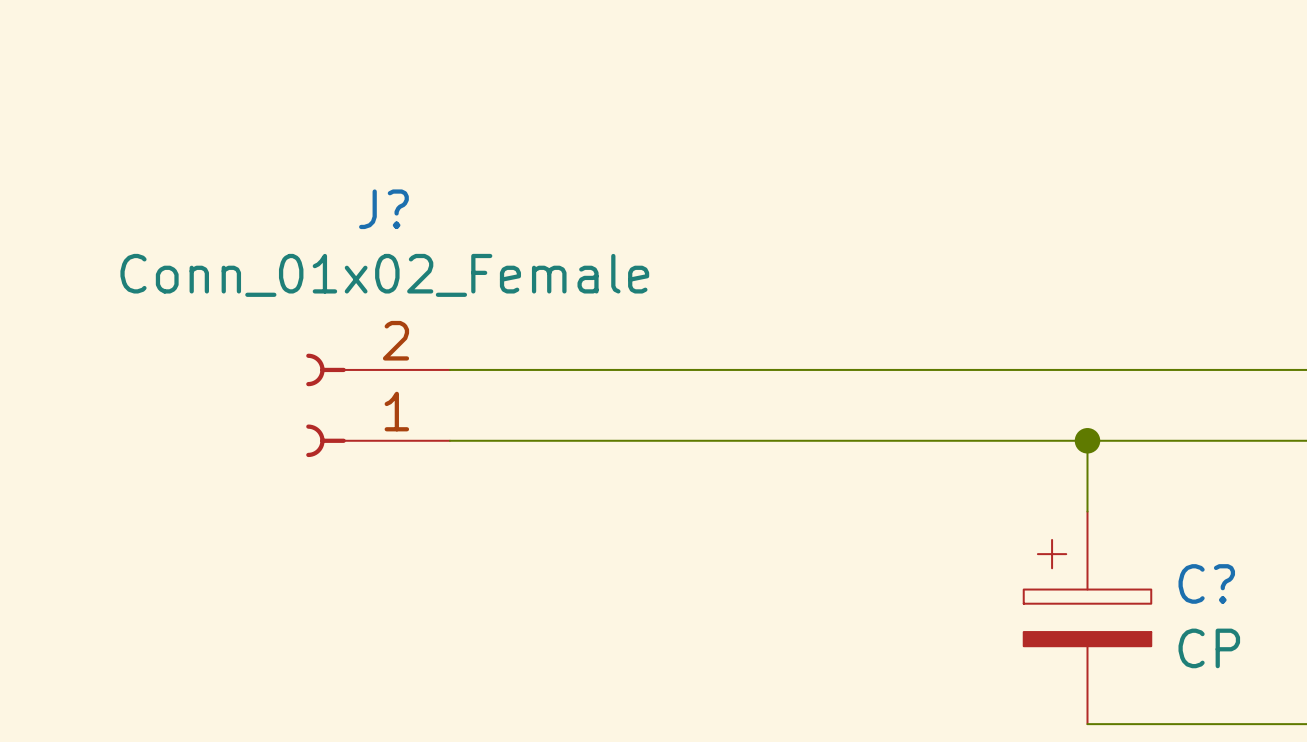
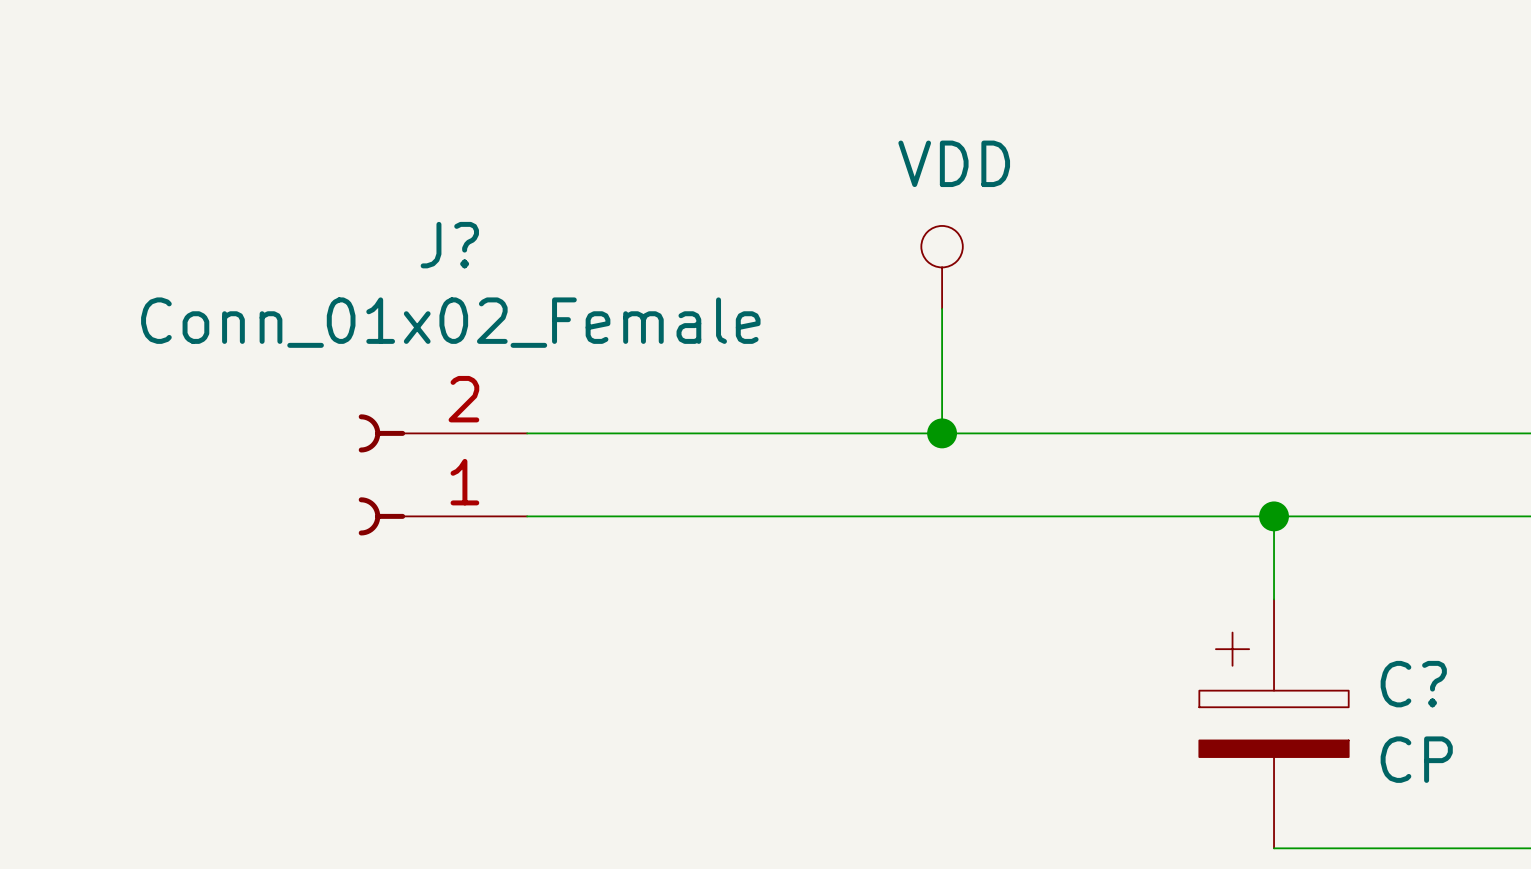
power symbol: none -> VDD (942, 267)
wire: none -> (942, 308) (942, 433)
junction: none -> (942, 433)

